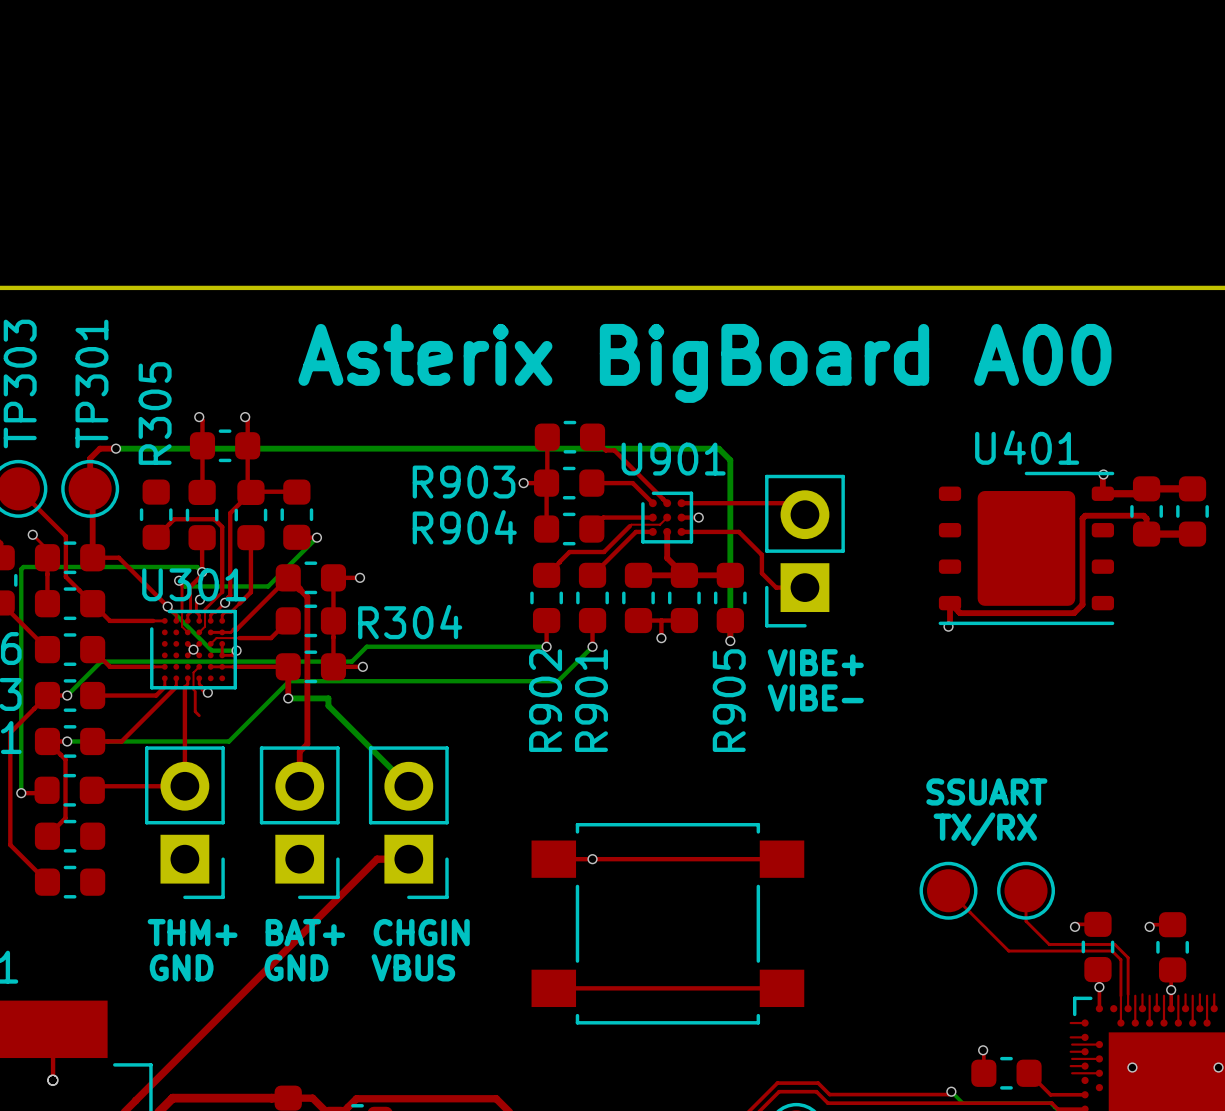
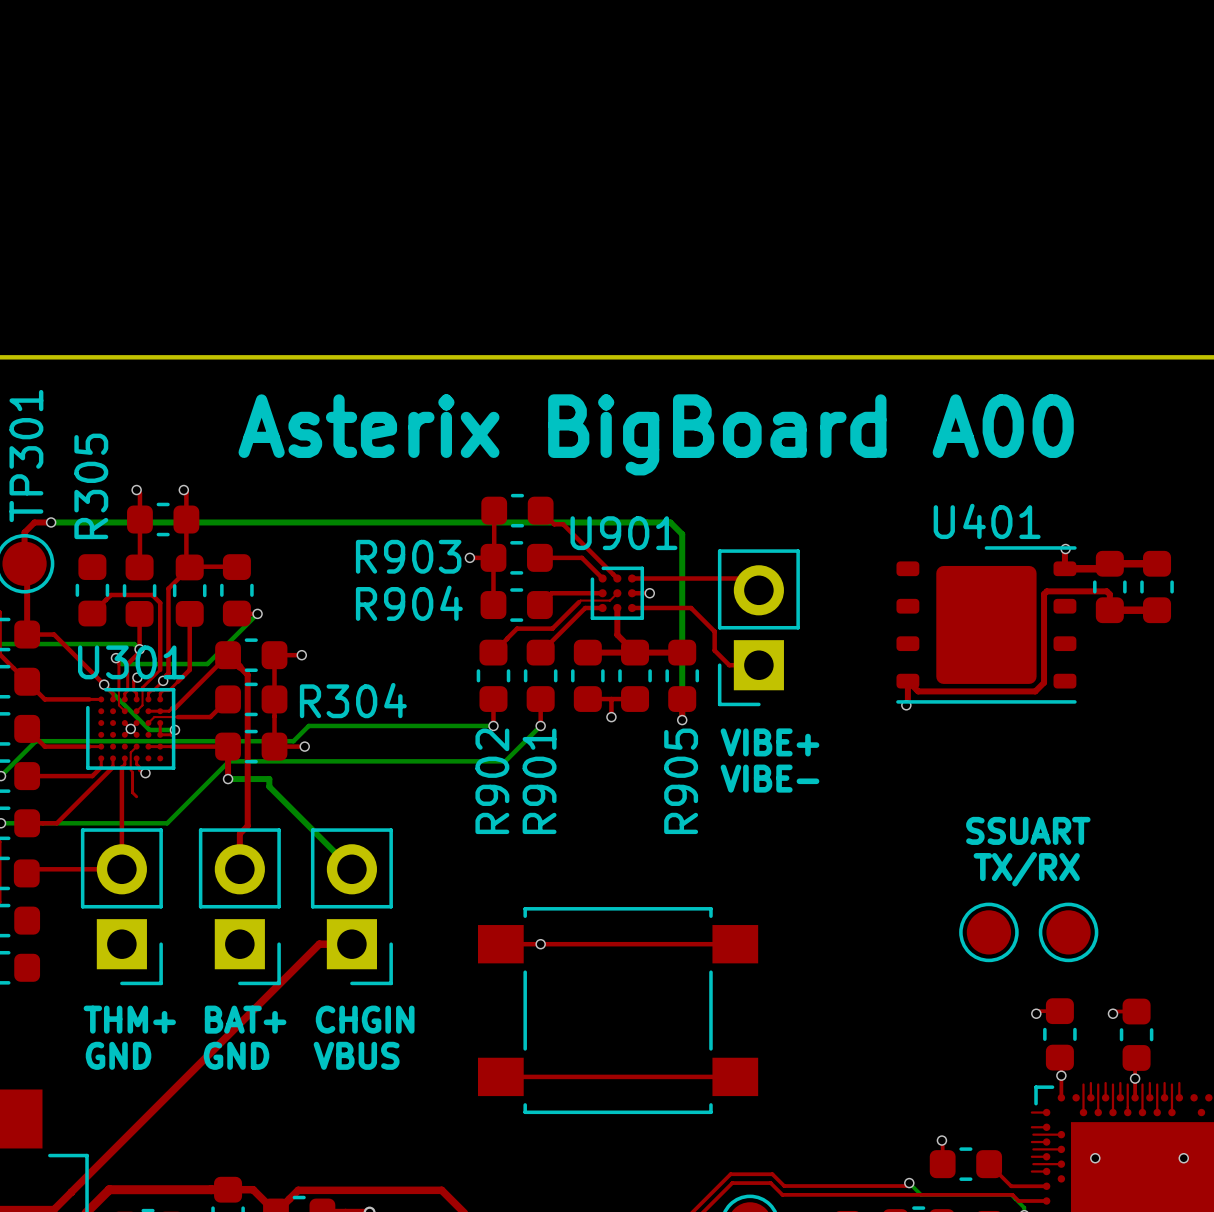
text position: SSUART (986, 791) -> SSUART (1028, 830)
text position: TX/RX (985, 829) -> TX/RX (1026, 869)
part: none -> (1068, 932)
top track: (948, 890) (1008, 951) (1112, 951) (1120, 959) (1120, 995) -> none
part: (948, 890) -> none
top track: (1026, 890) (1026, 921) (1049, 944) (1114, 944) (1128, 957) (1128, 994) -> none
part position: (1026, 890) -> (988, 932)
top track: none -> (1031, 1171) (1046, 1171)

